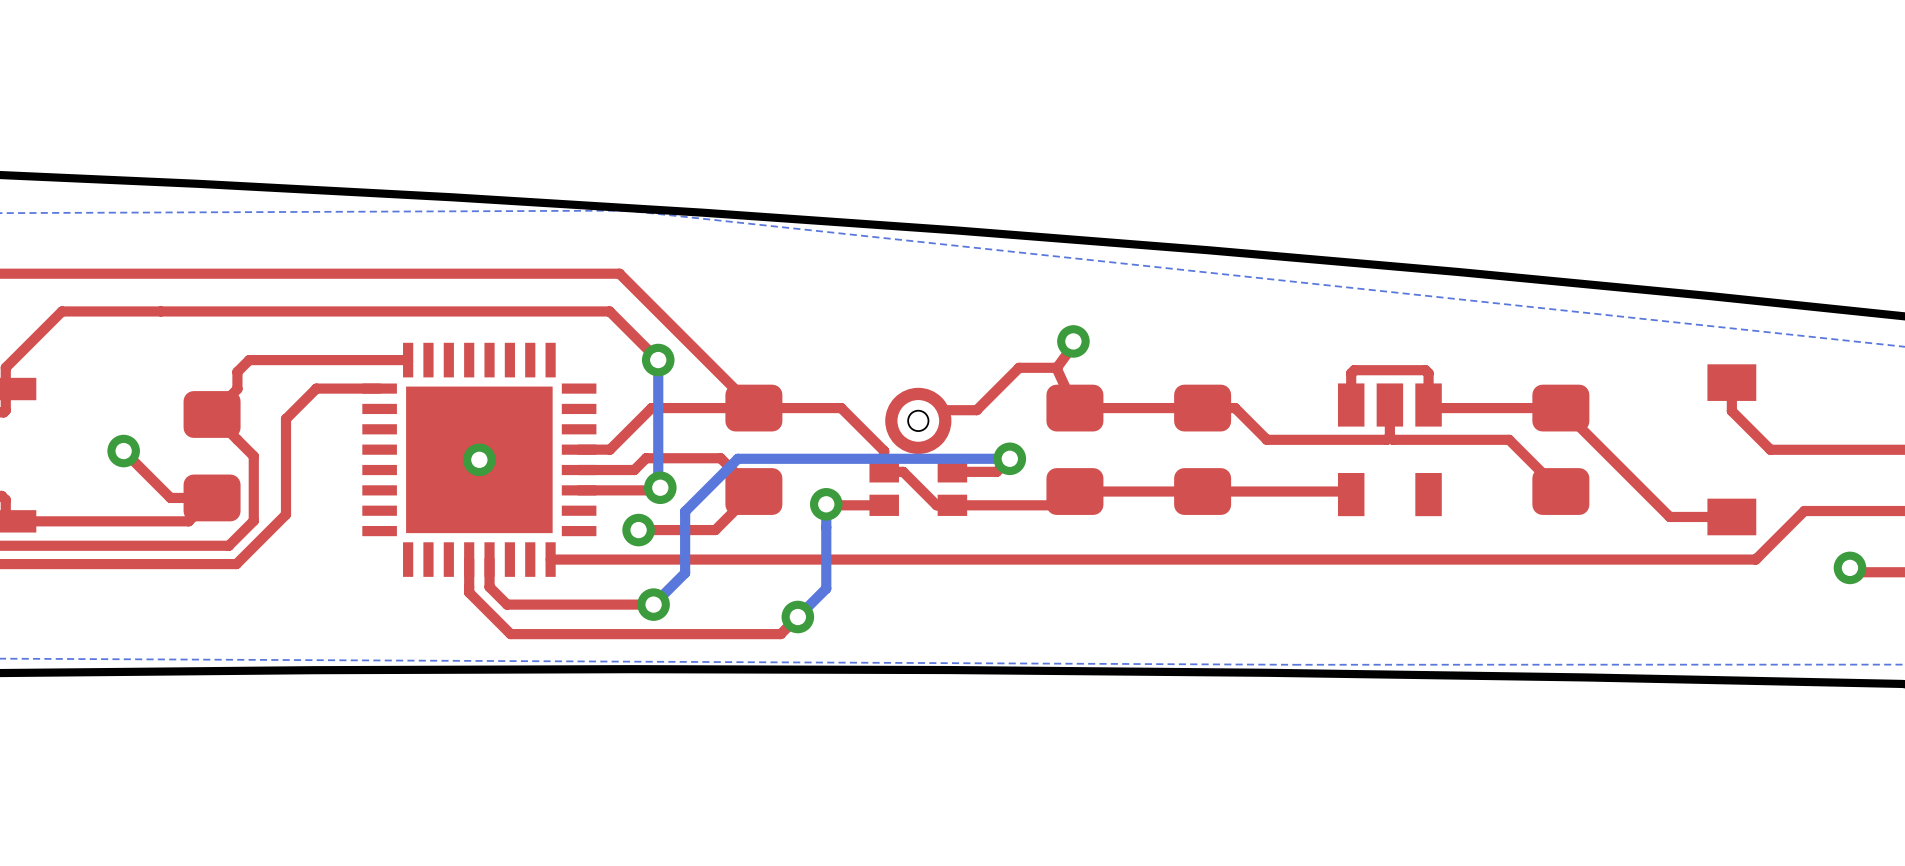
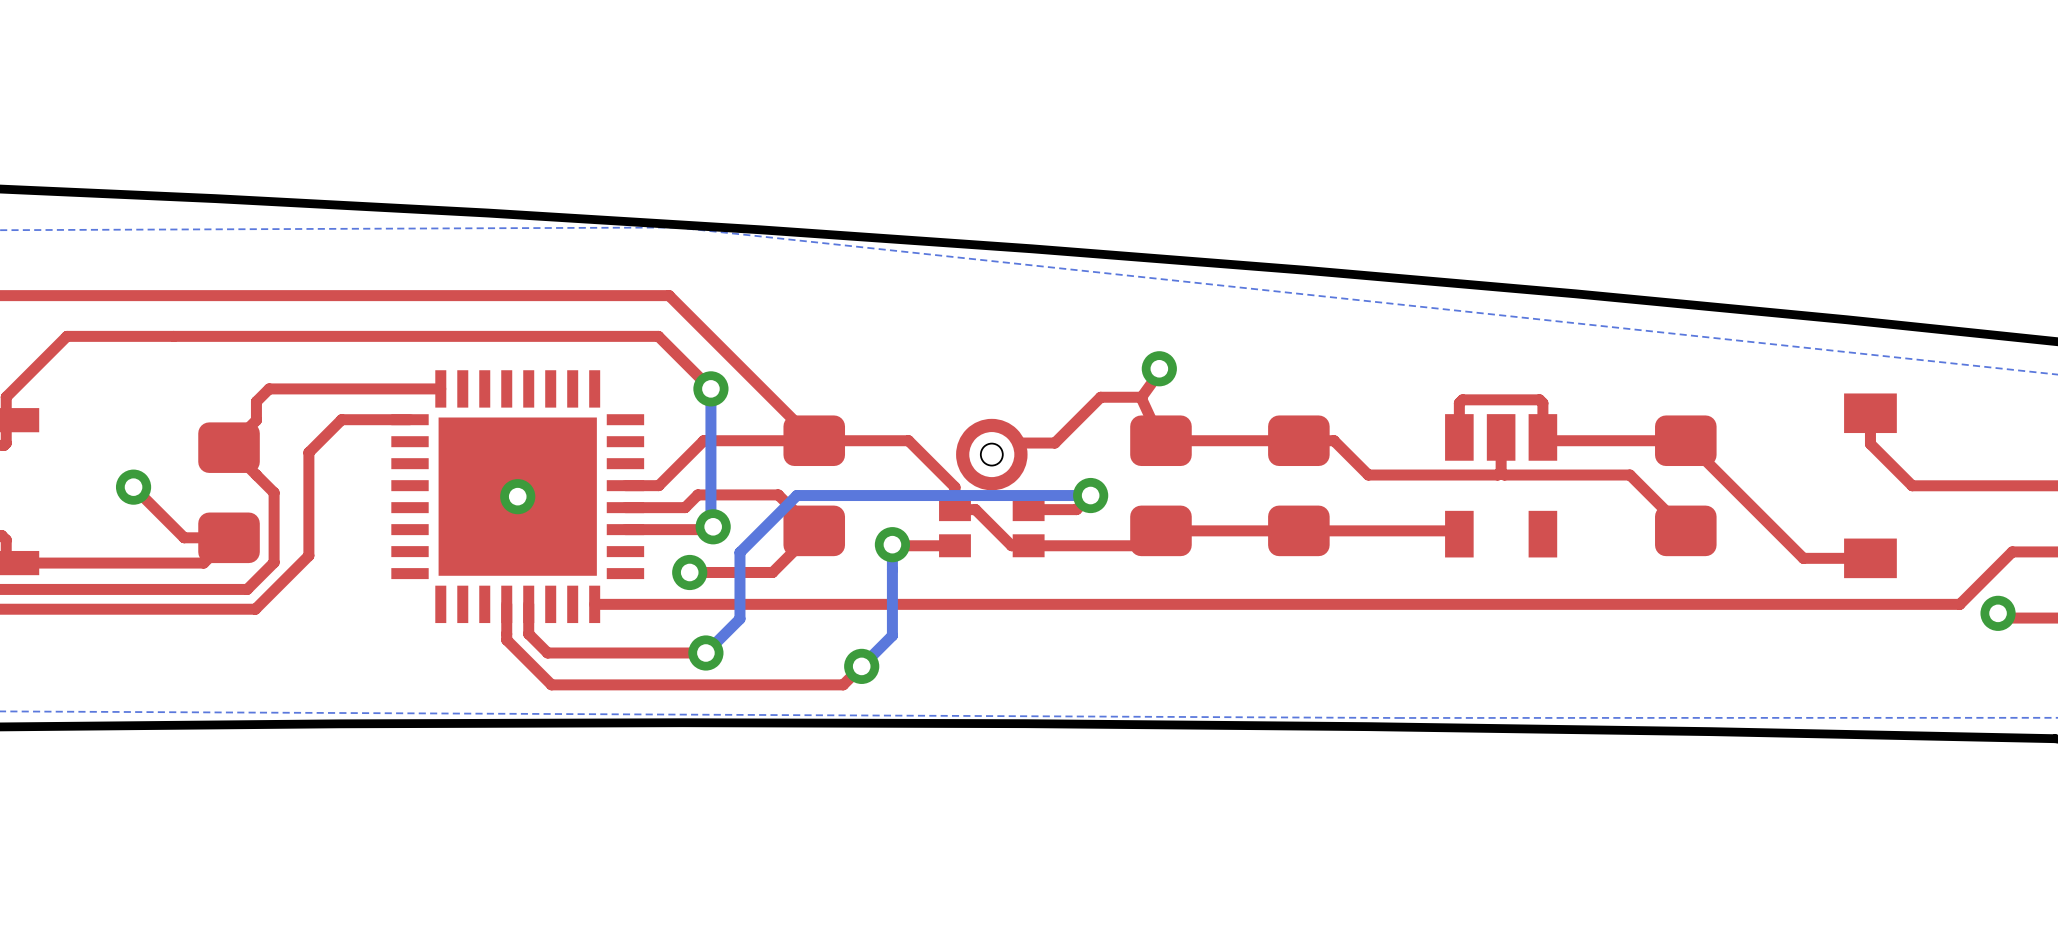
top track: (1863, 511) (1804, 511) (1755, 559) -> (2012, 551) (1959, 604) (1896, 604)

